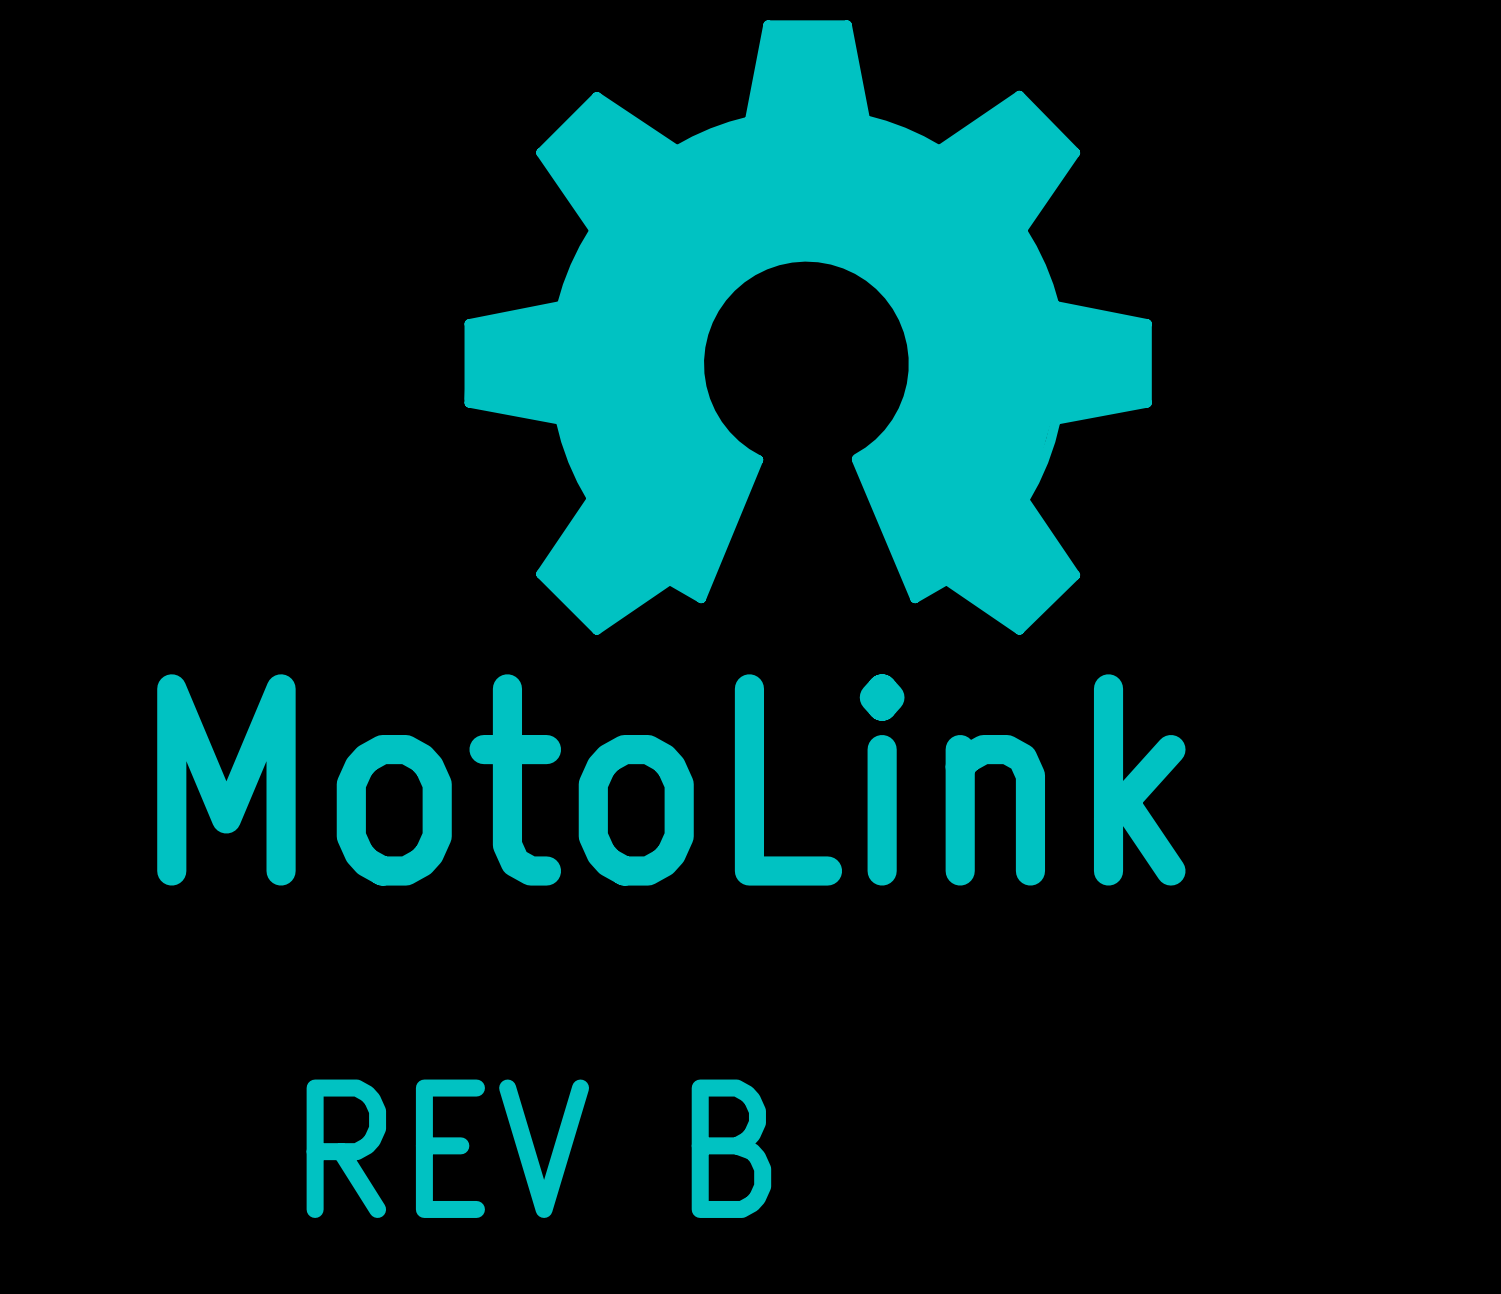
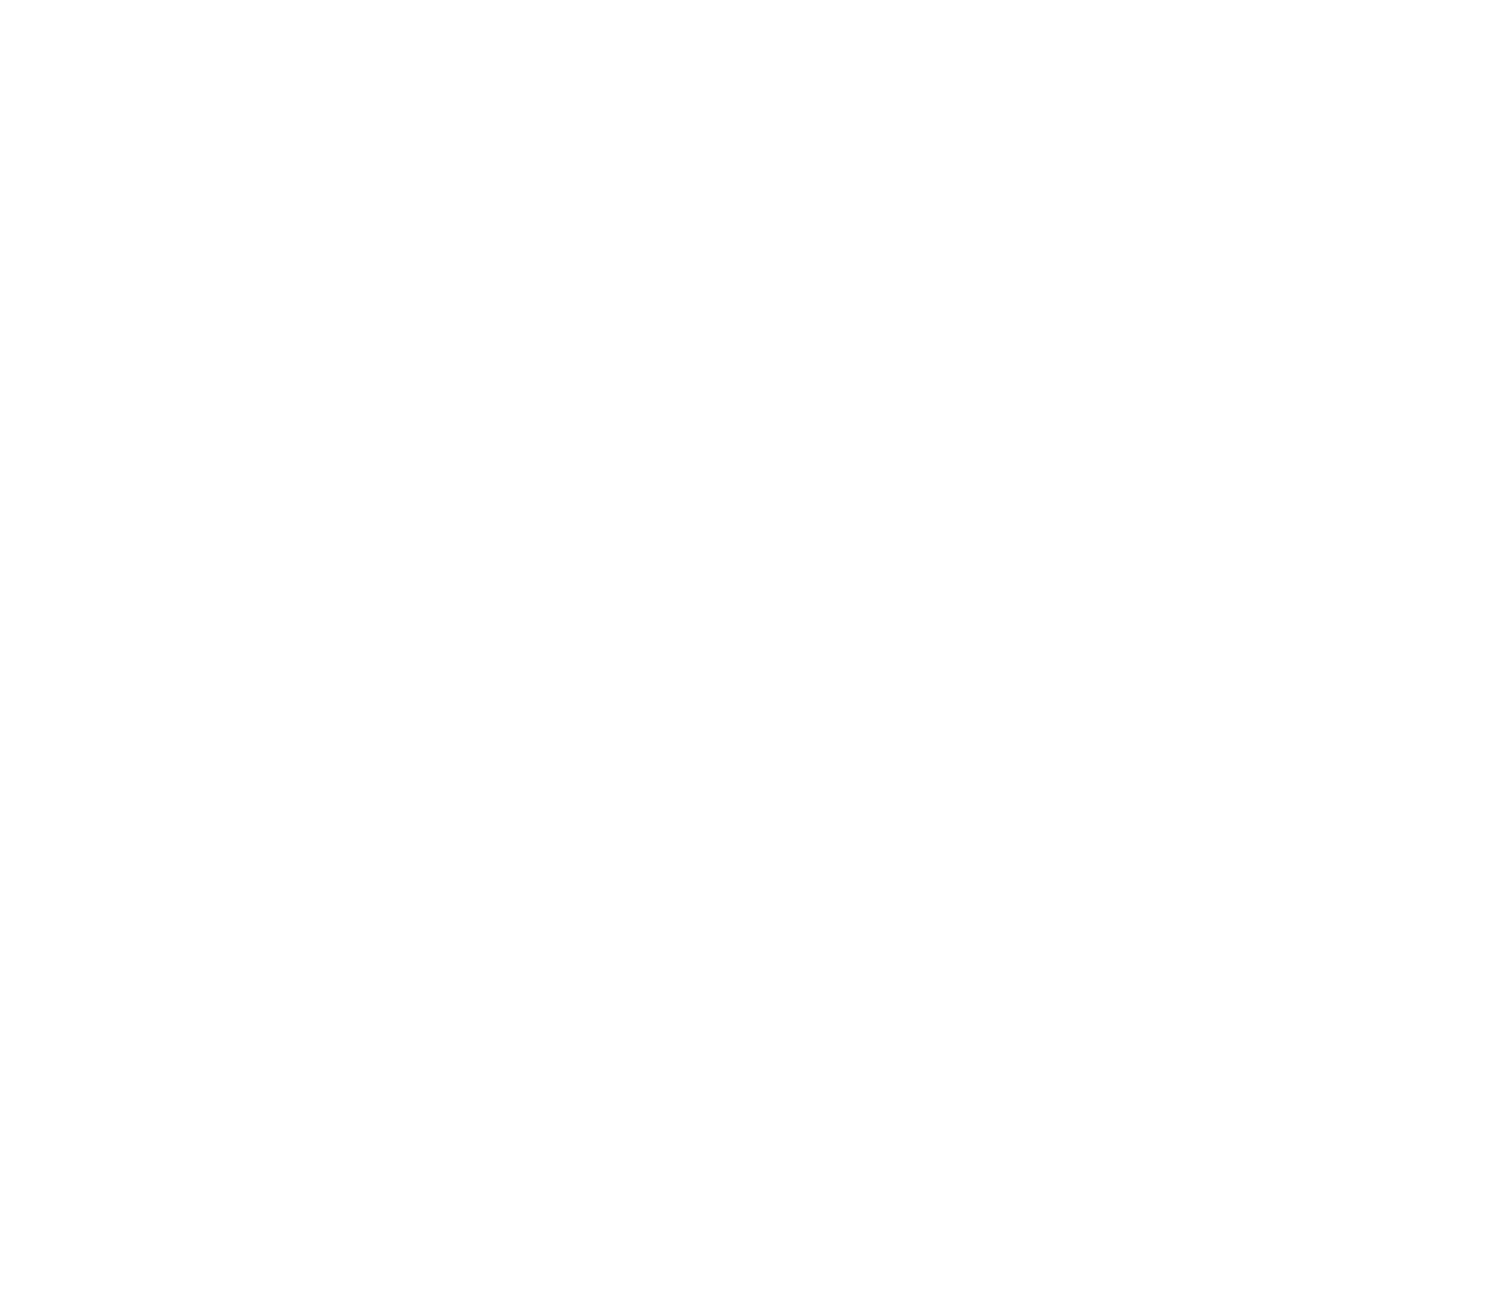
drawing: [464, 20, 1152, 635] -> none
text: MotoLink (671, 779) -> none
text: REV B (538, 1148) -> none

